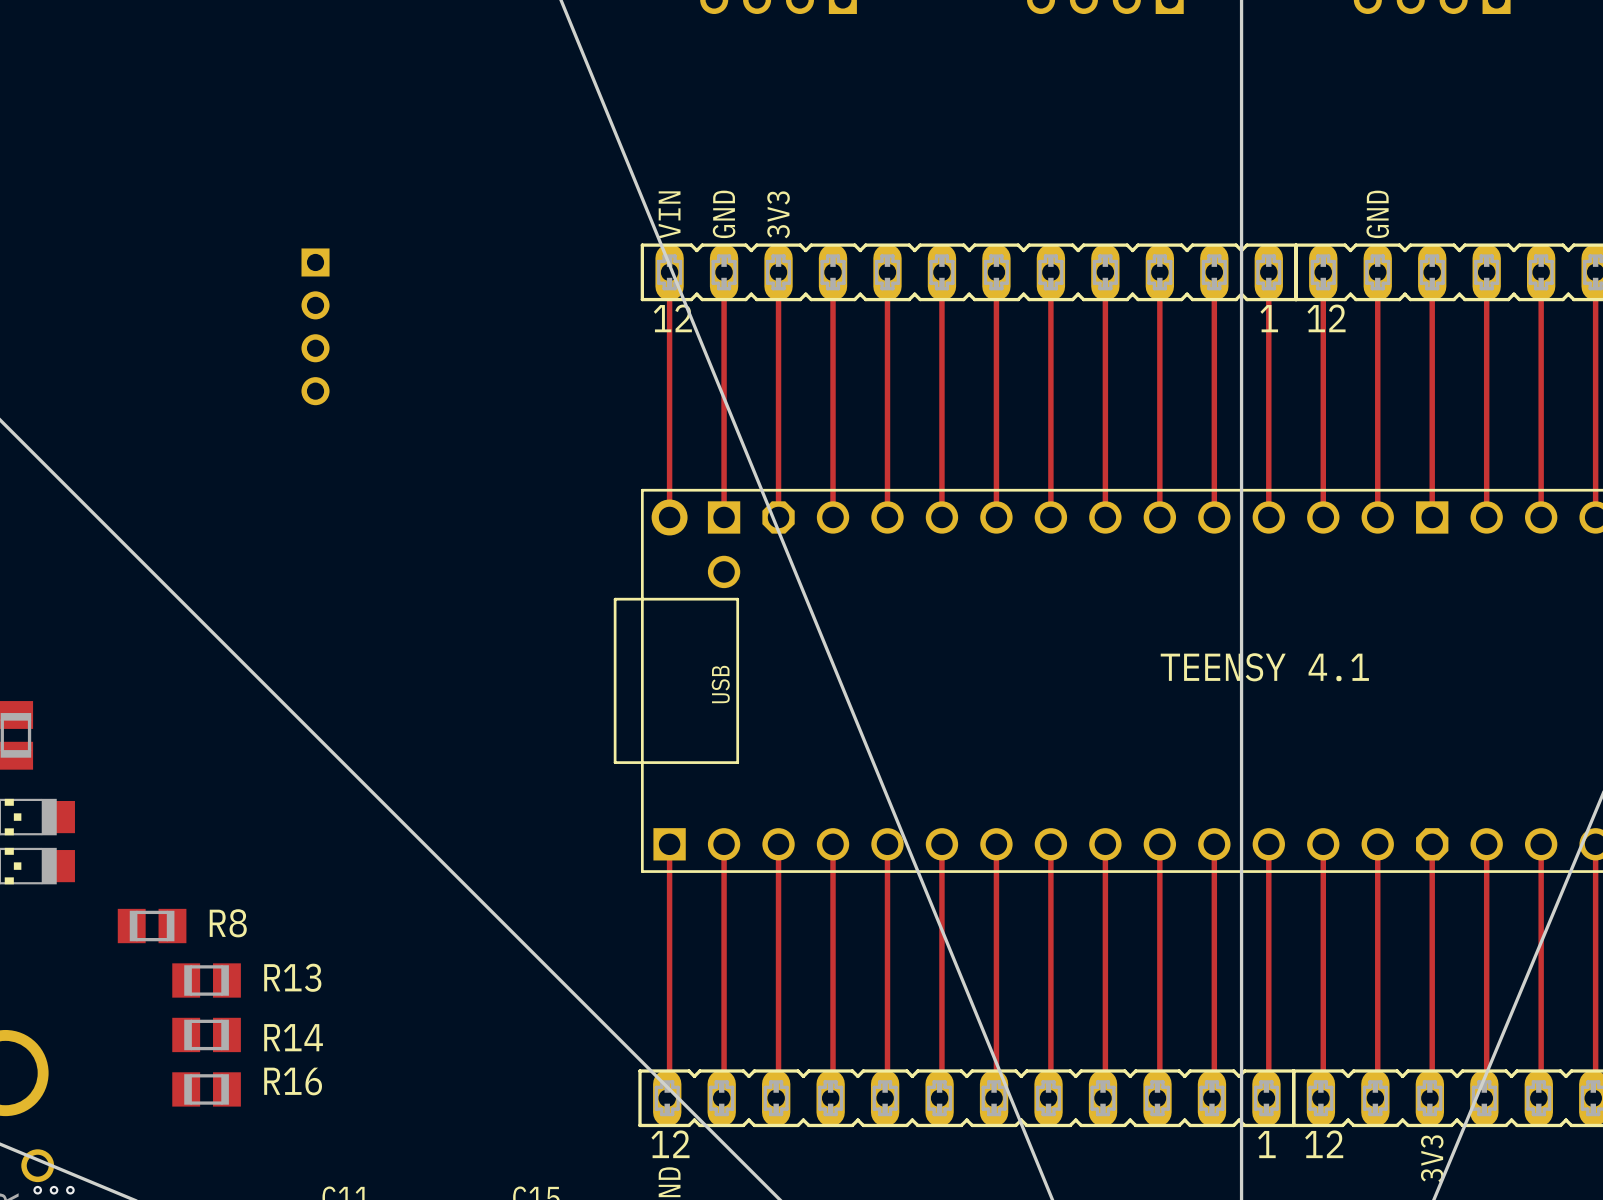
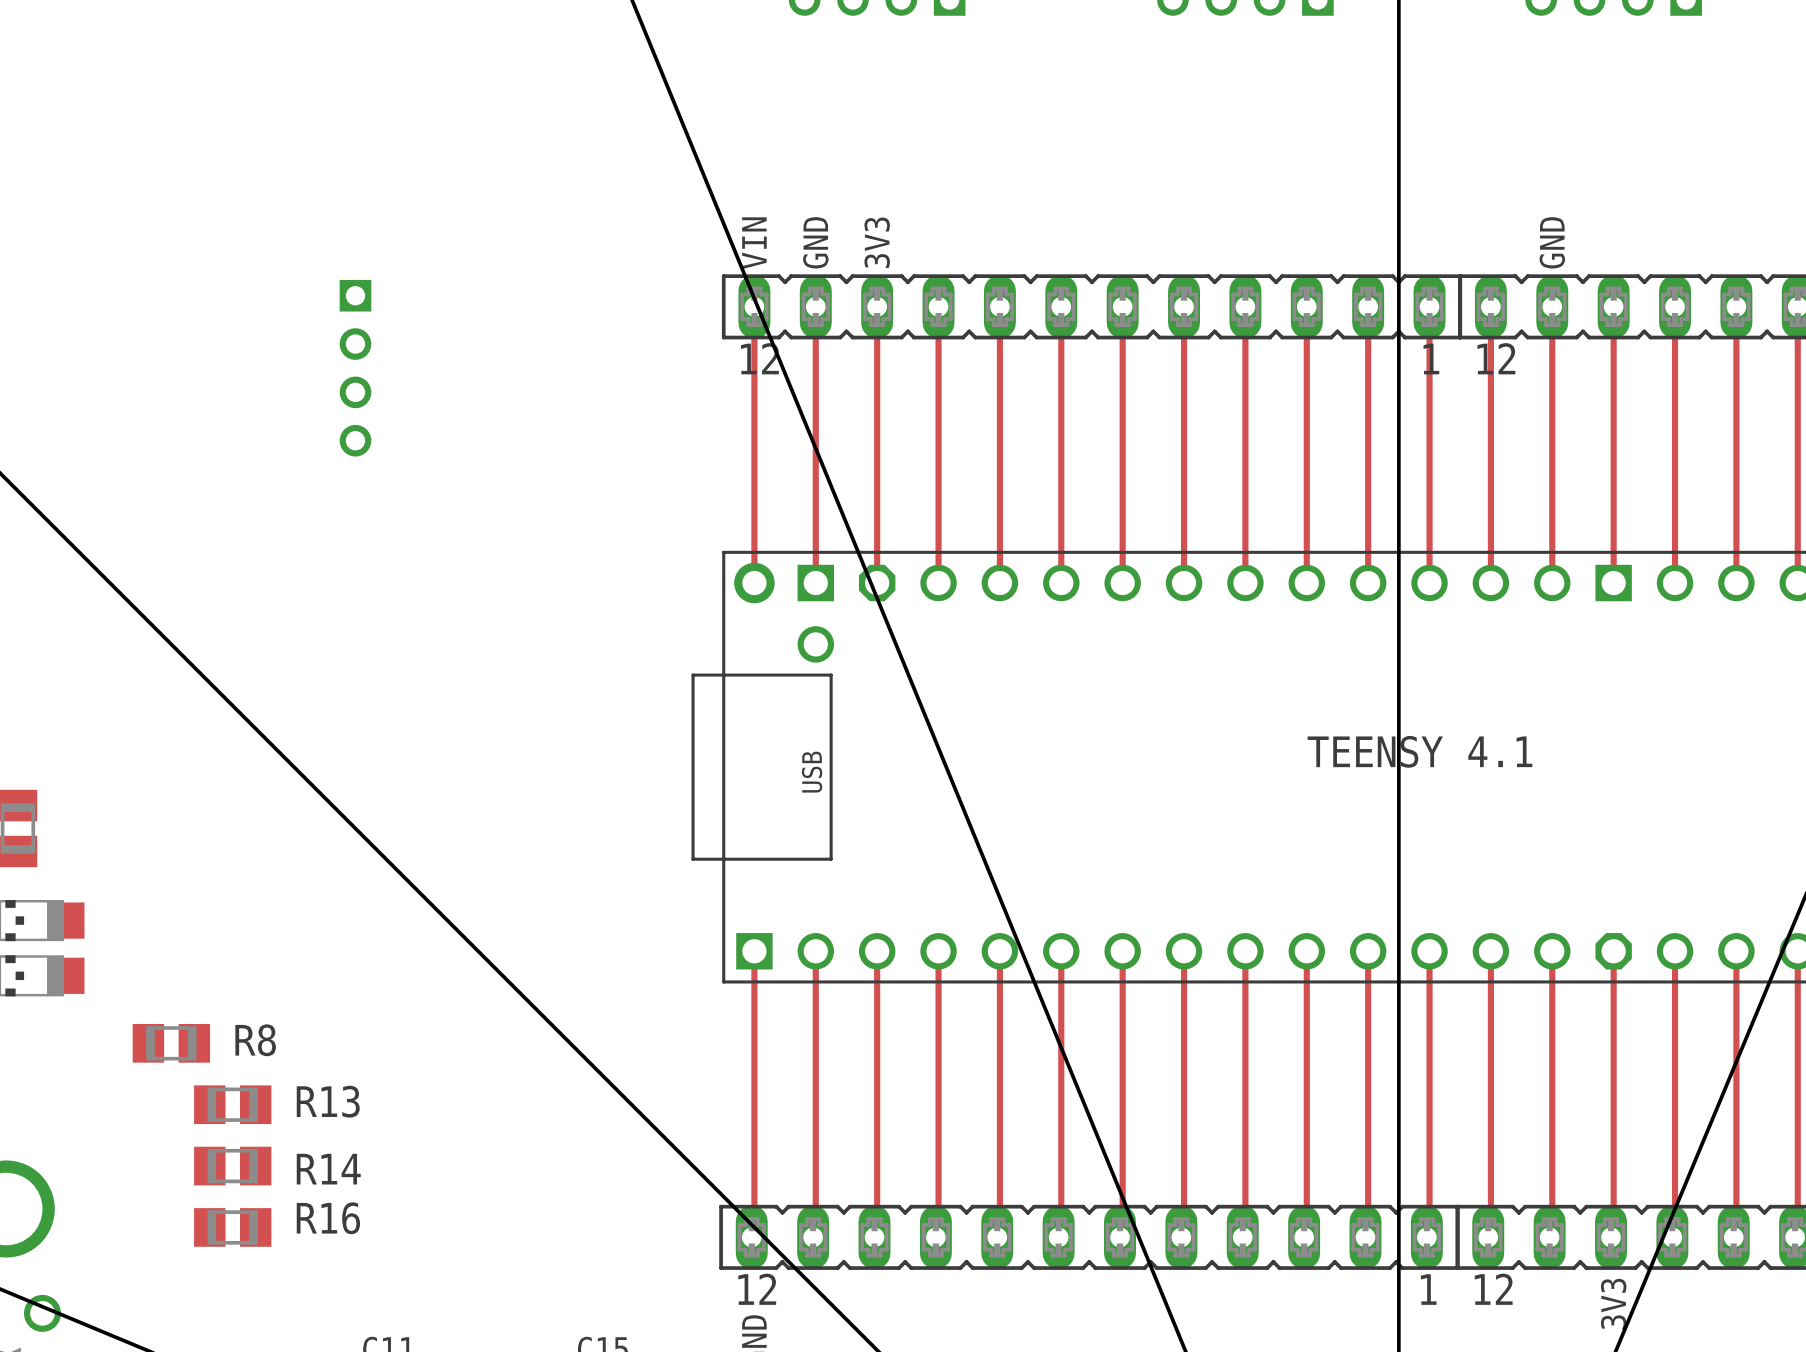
via: (37, 1190) -> none
via: (54, 1190) -> none
via: (70, 1190) -> none

